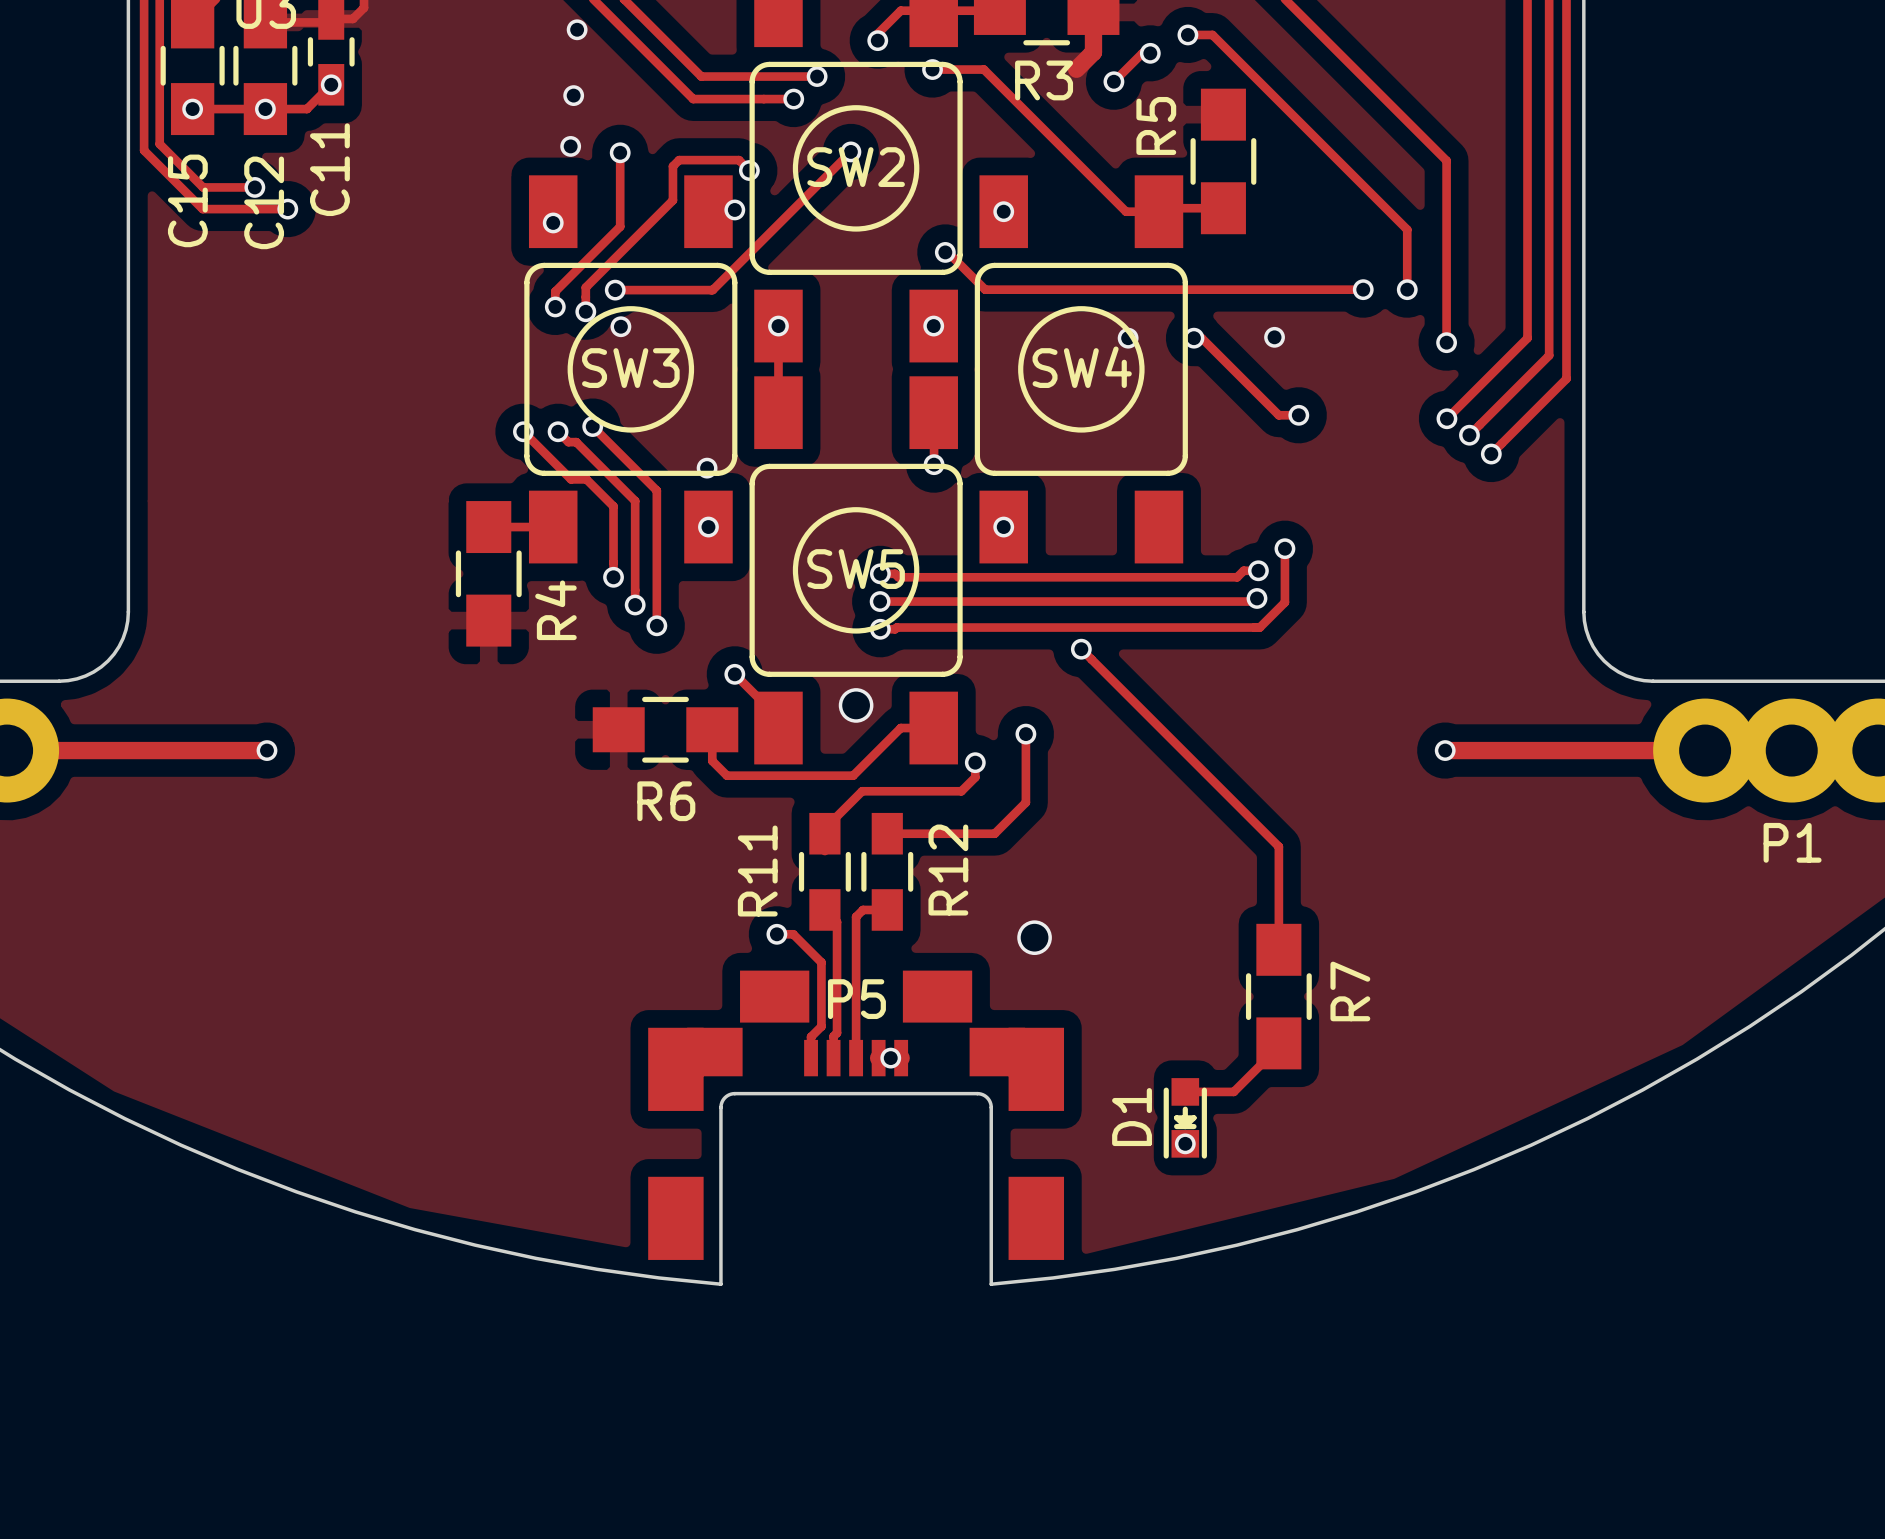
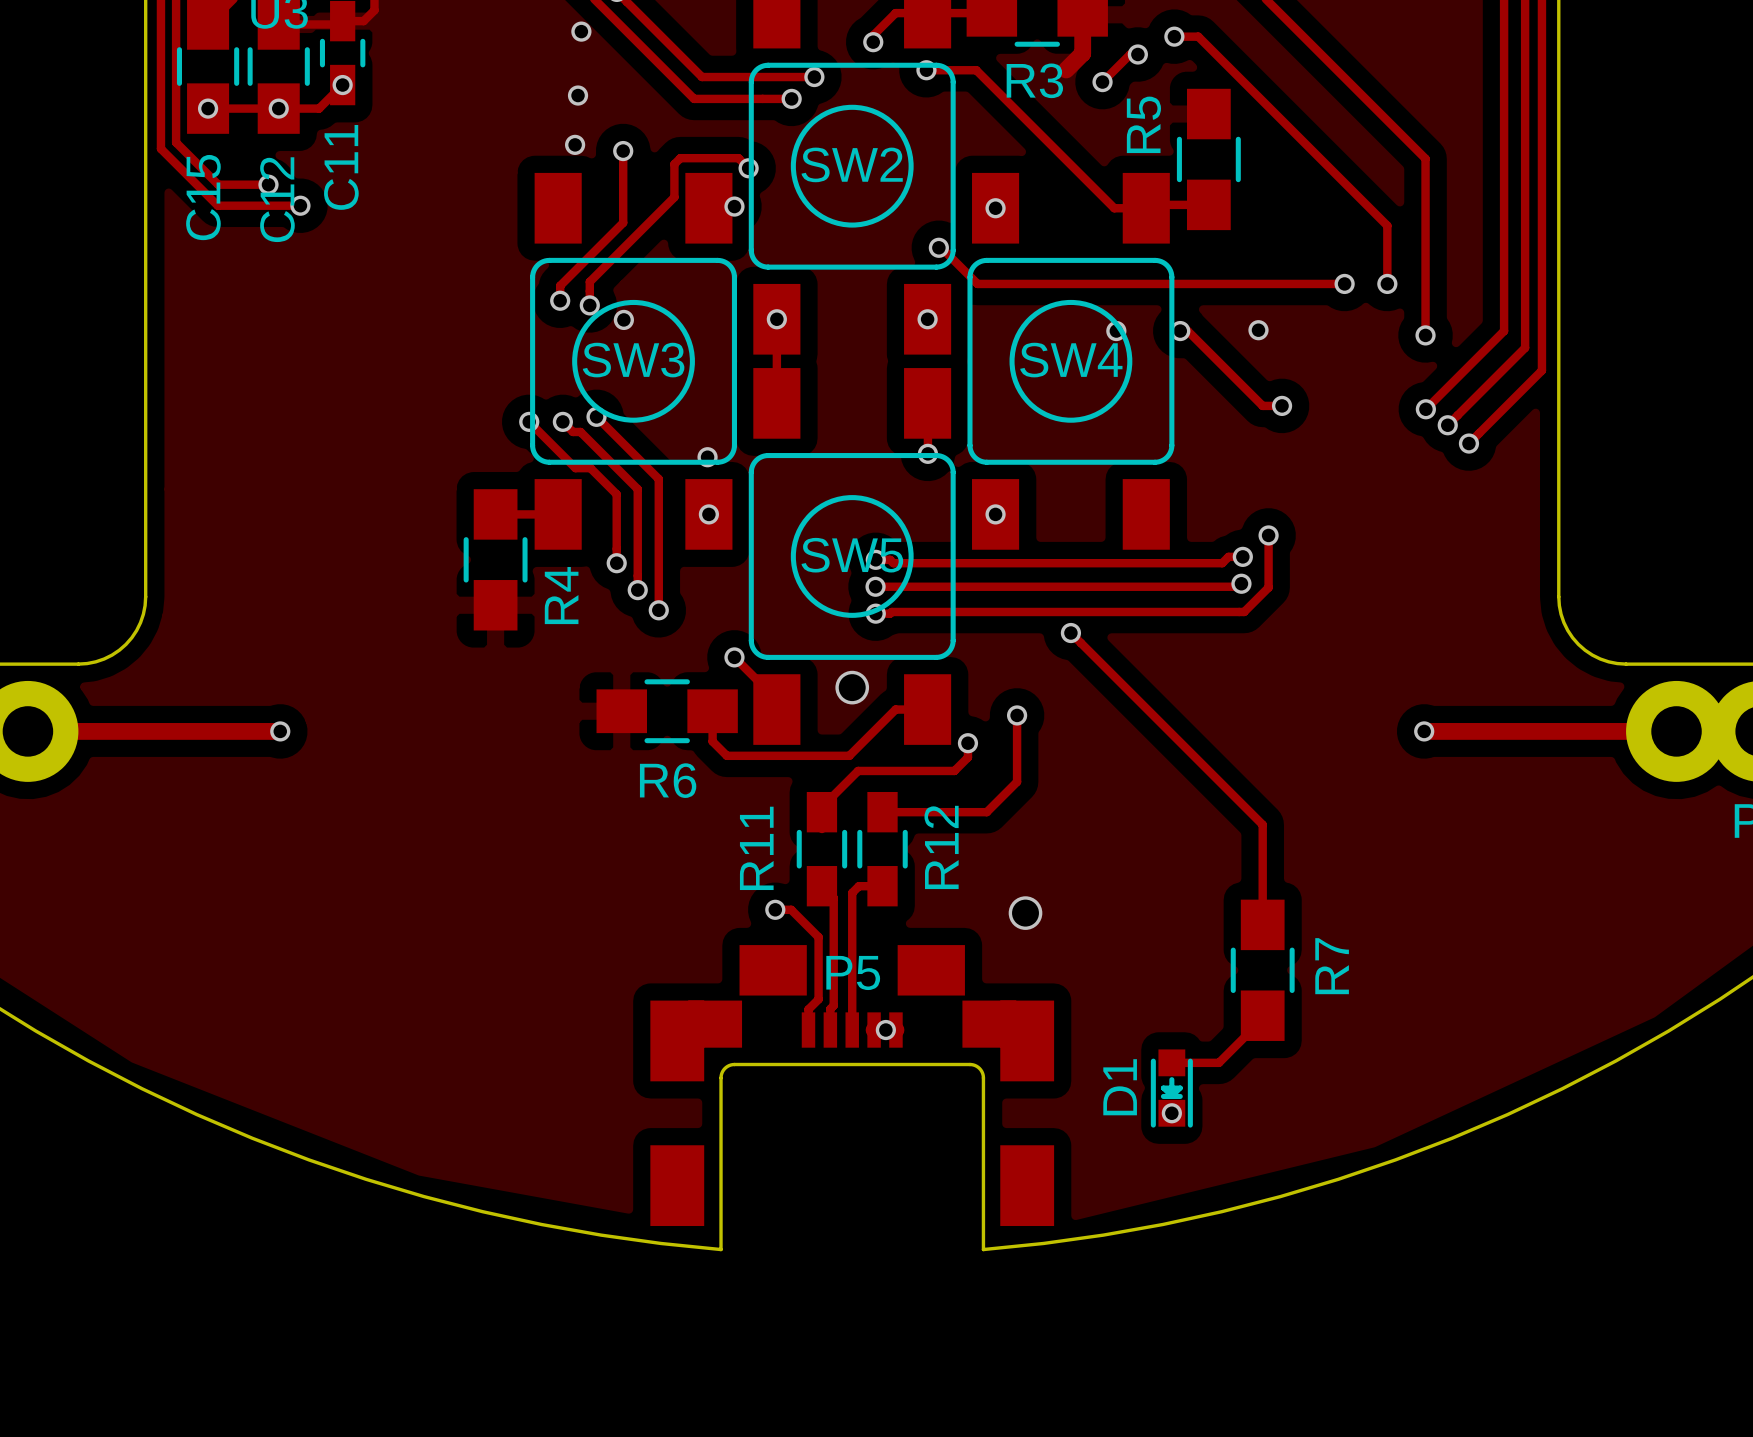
track: (850, 151) (712, 290) (615, 290) -> none
via: (850, 151) -> none
via: (553, 222) -> none
via: (615, 290) -> none

